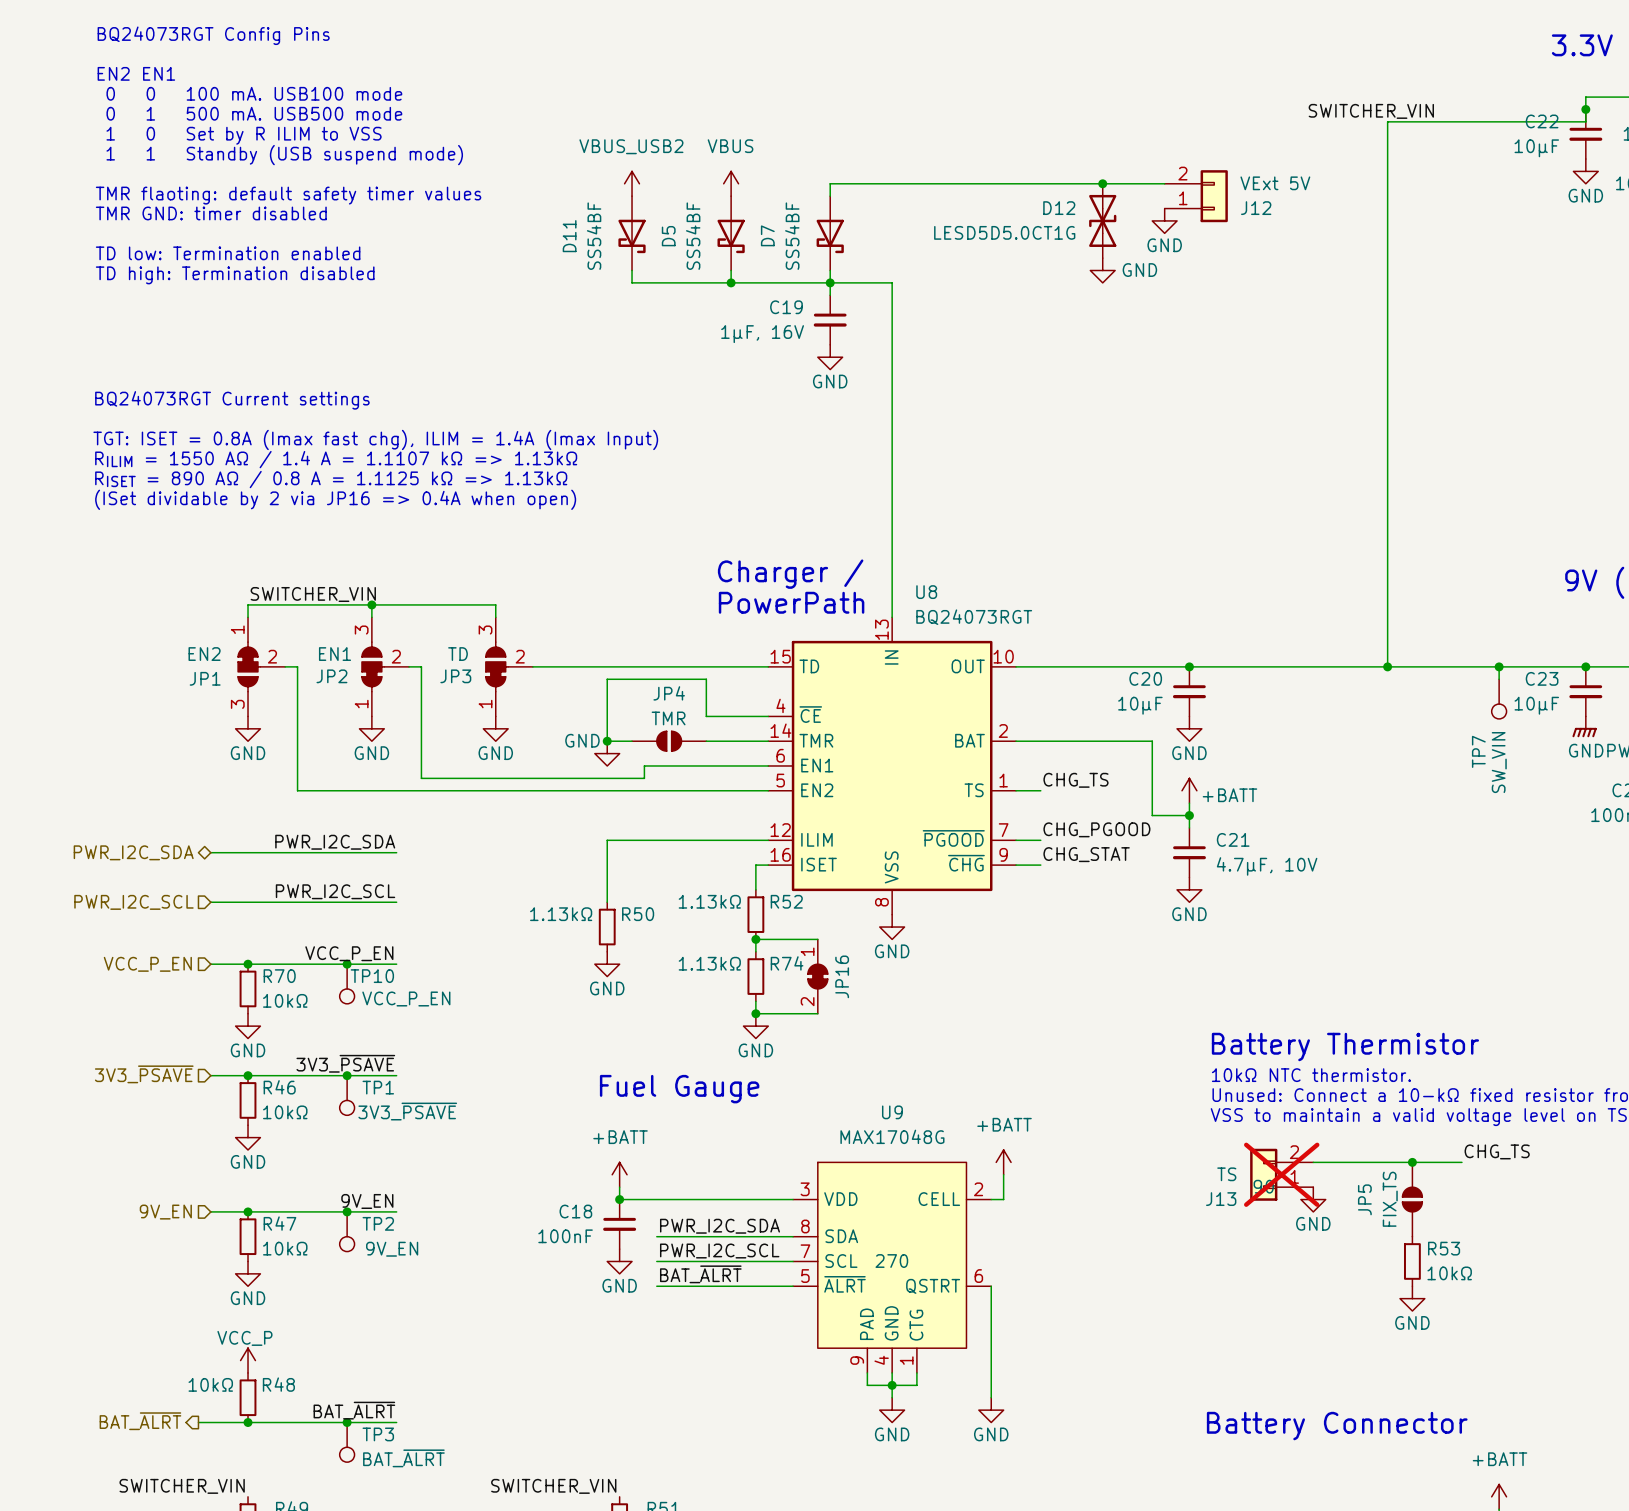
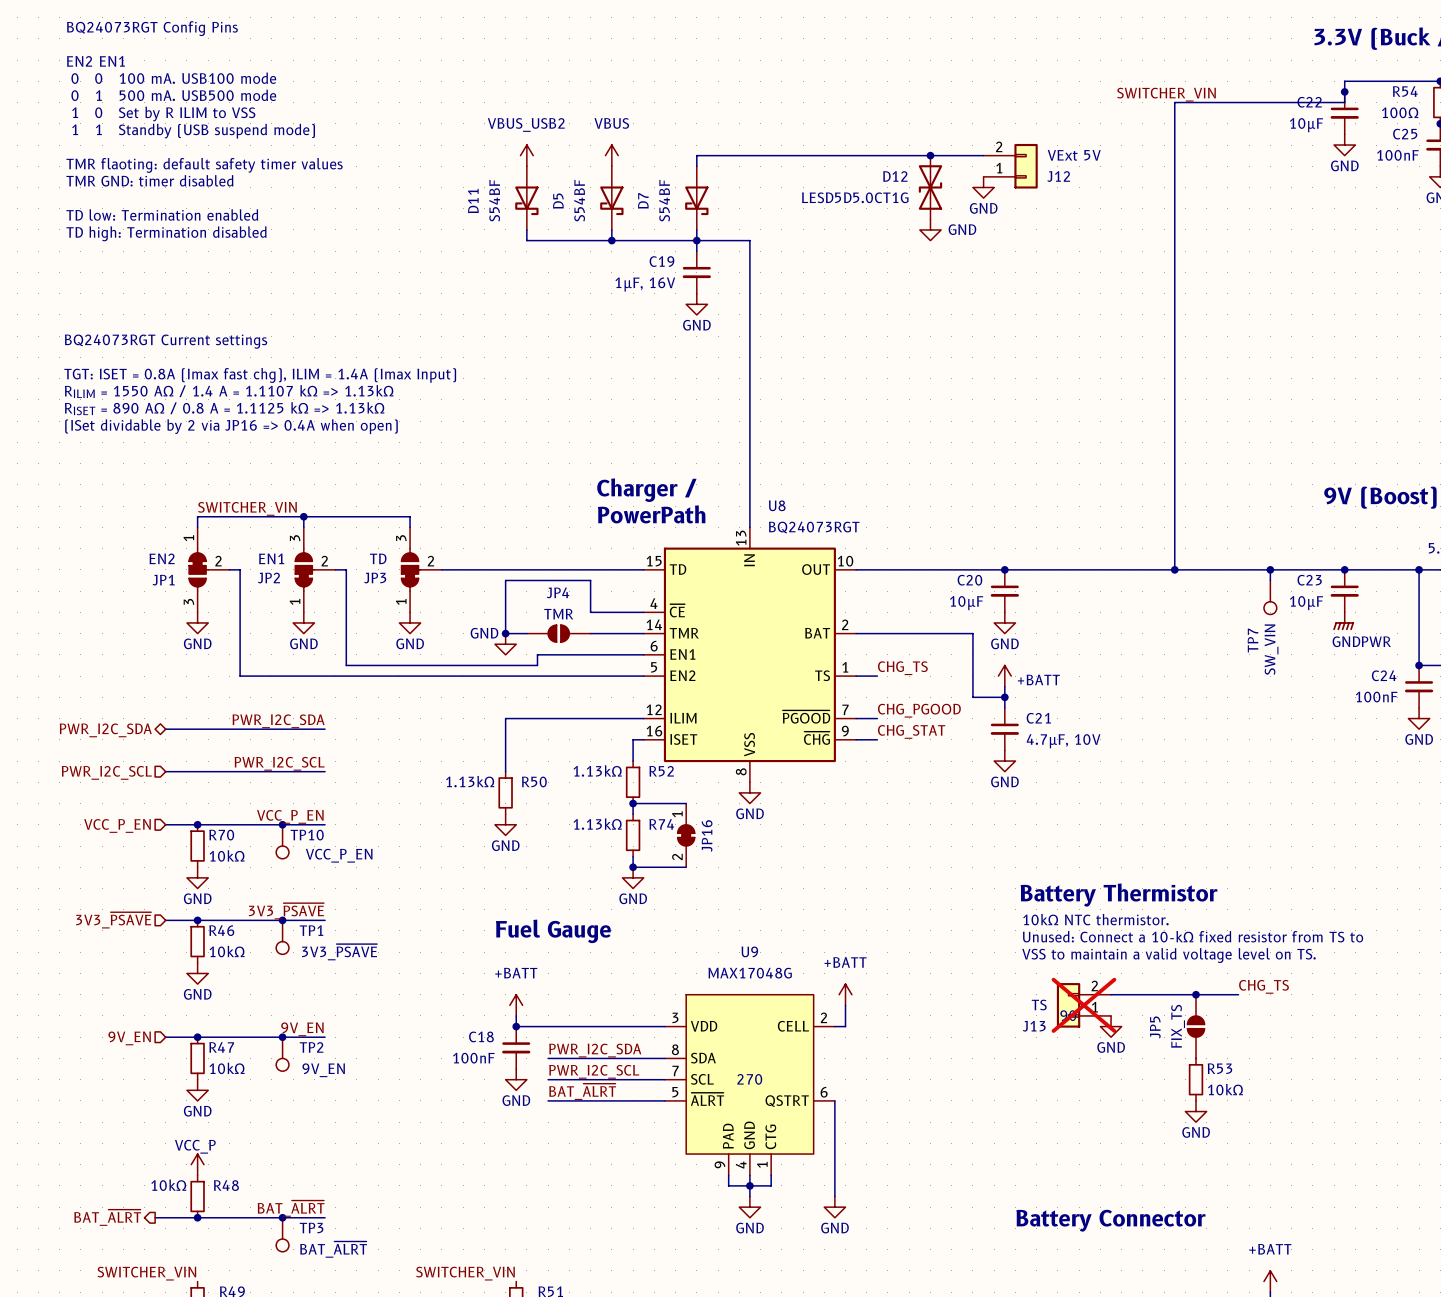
D11 value: SS54BF (594, 236) -> S54BF (494, 200)
D5 value: SS54BF (693, 236) -> S54BF (579, 200)
D7 value: SS54BF (792, 236) -> S54BF (664, 200)

